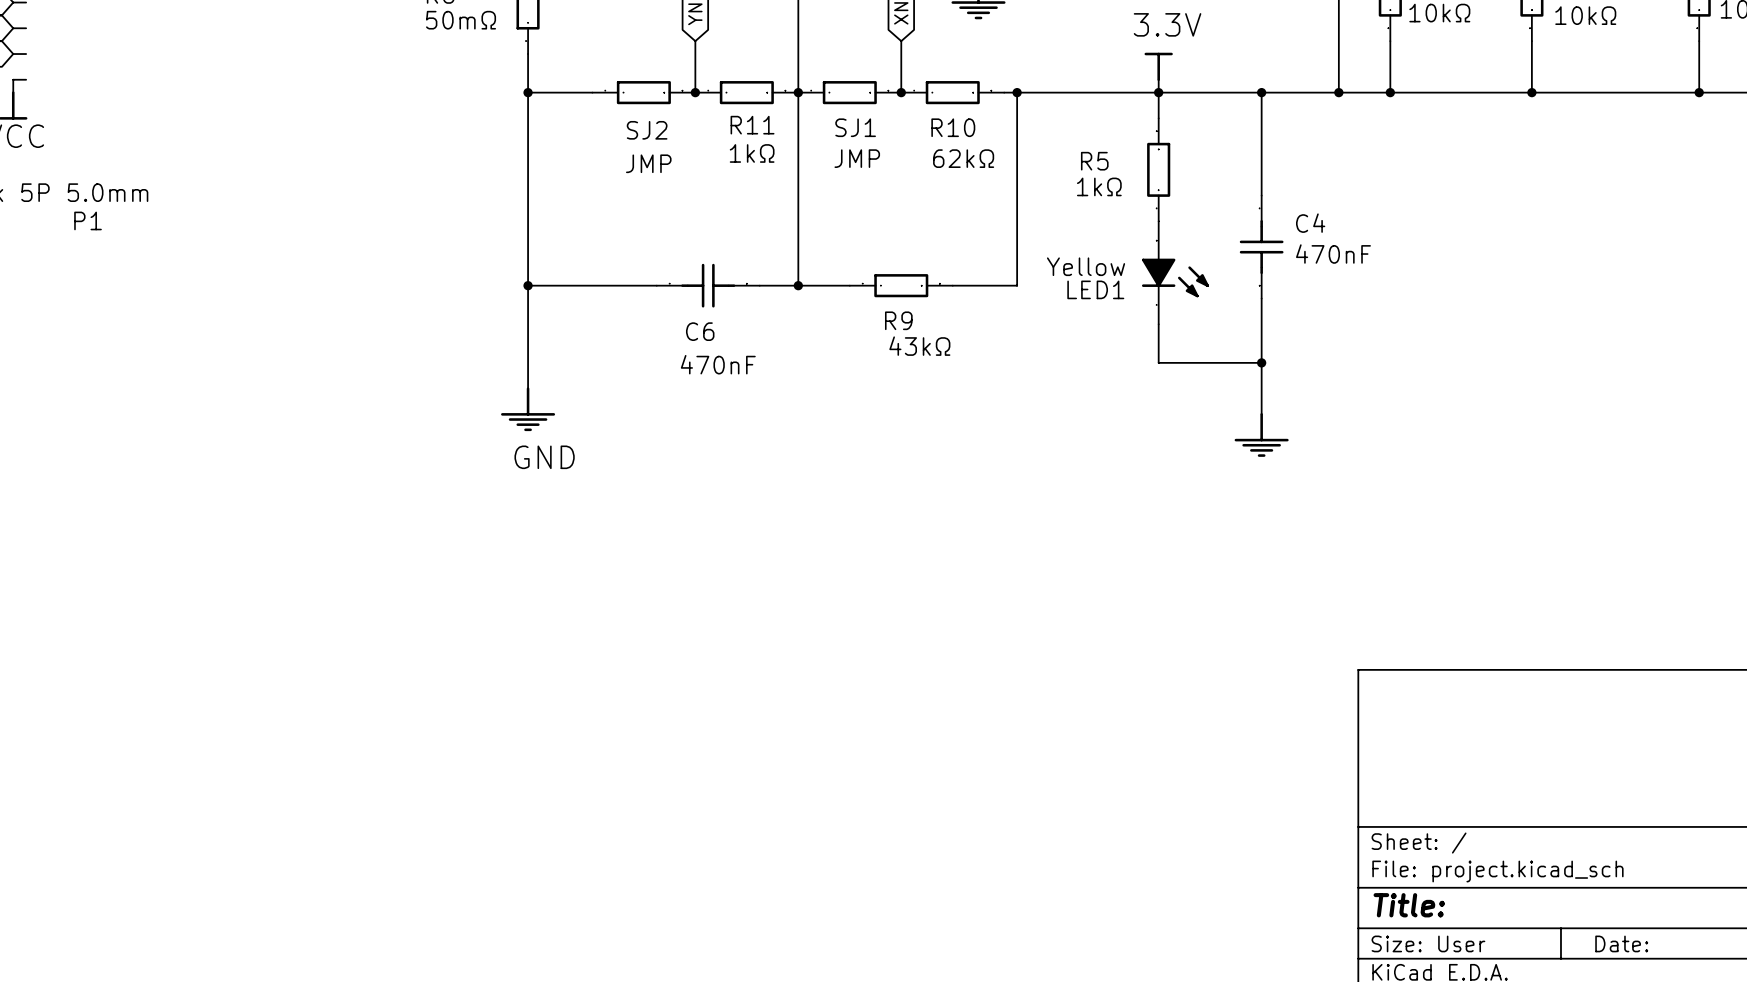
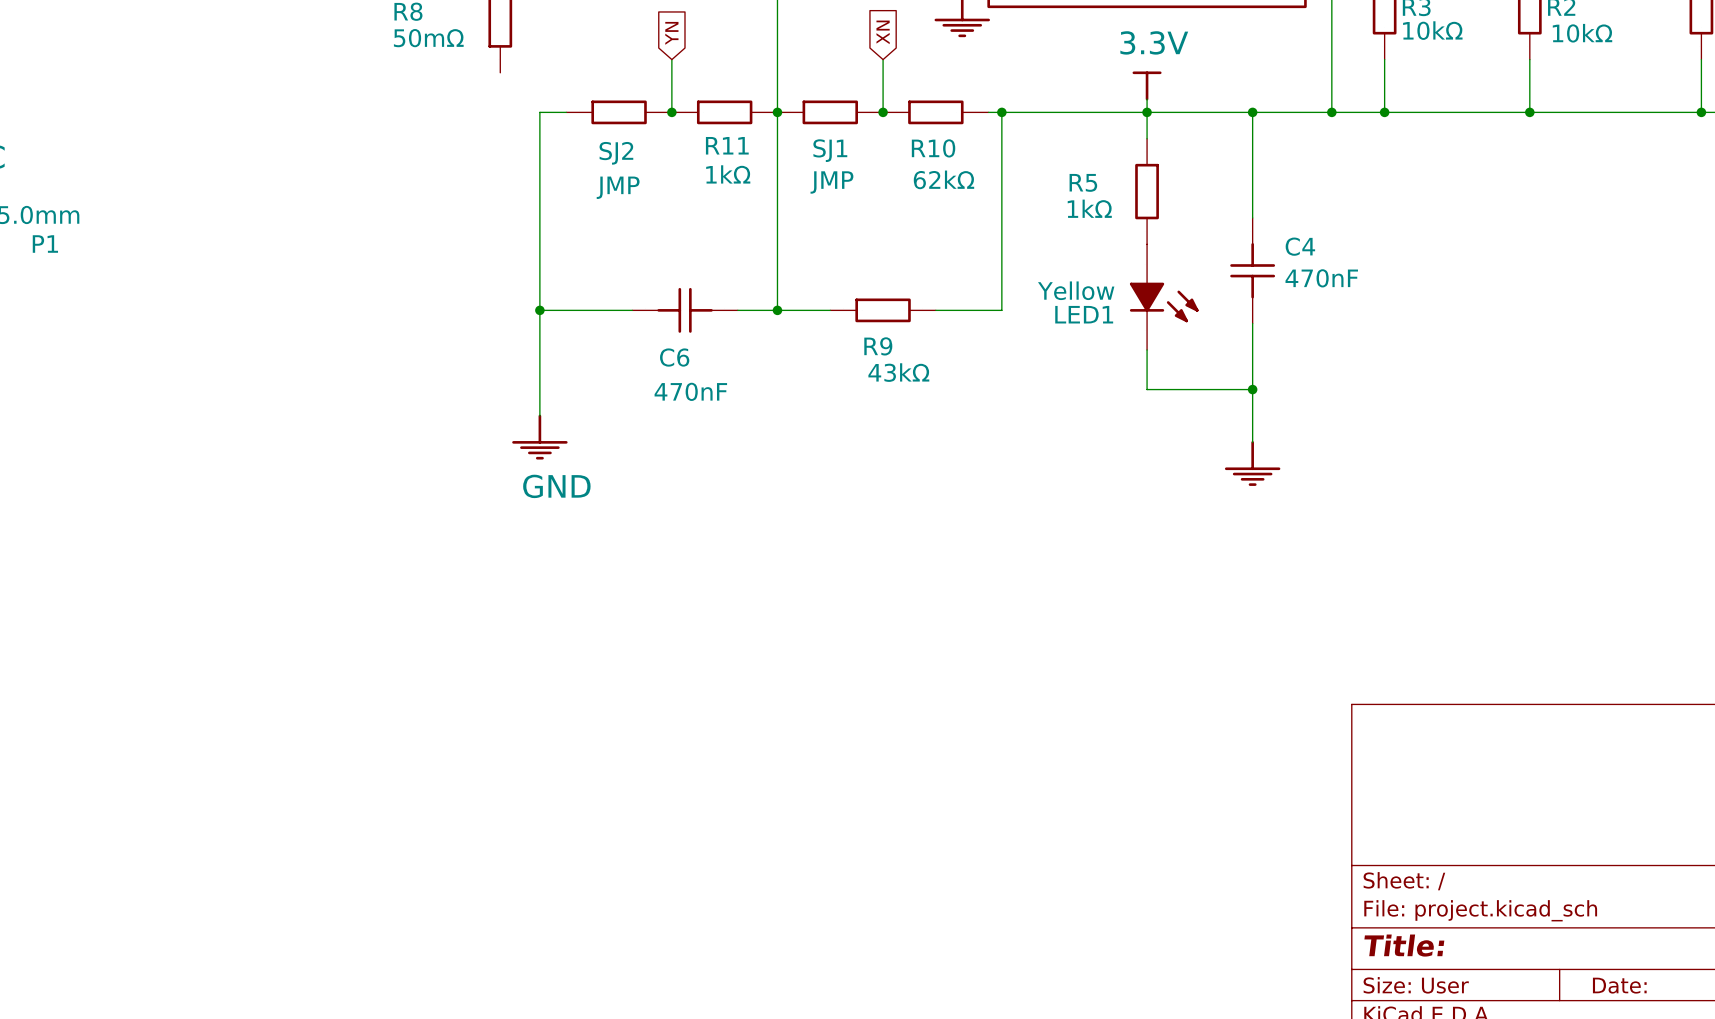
wire: (528, 54) (528, 388) -> none
wire: (528, 92) (566, 92) -> (539, 415) (539, 112)
junction: (528, 92) -> none
wire: (528, 285) (566, 285) -> none
junction position: (528, 285) -> (539, 310)
power symbol position: GND (528, 409) -> GND (539, 437)

